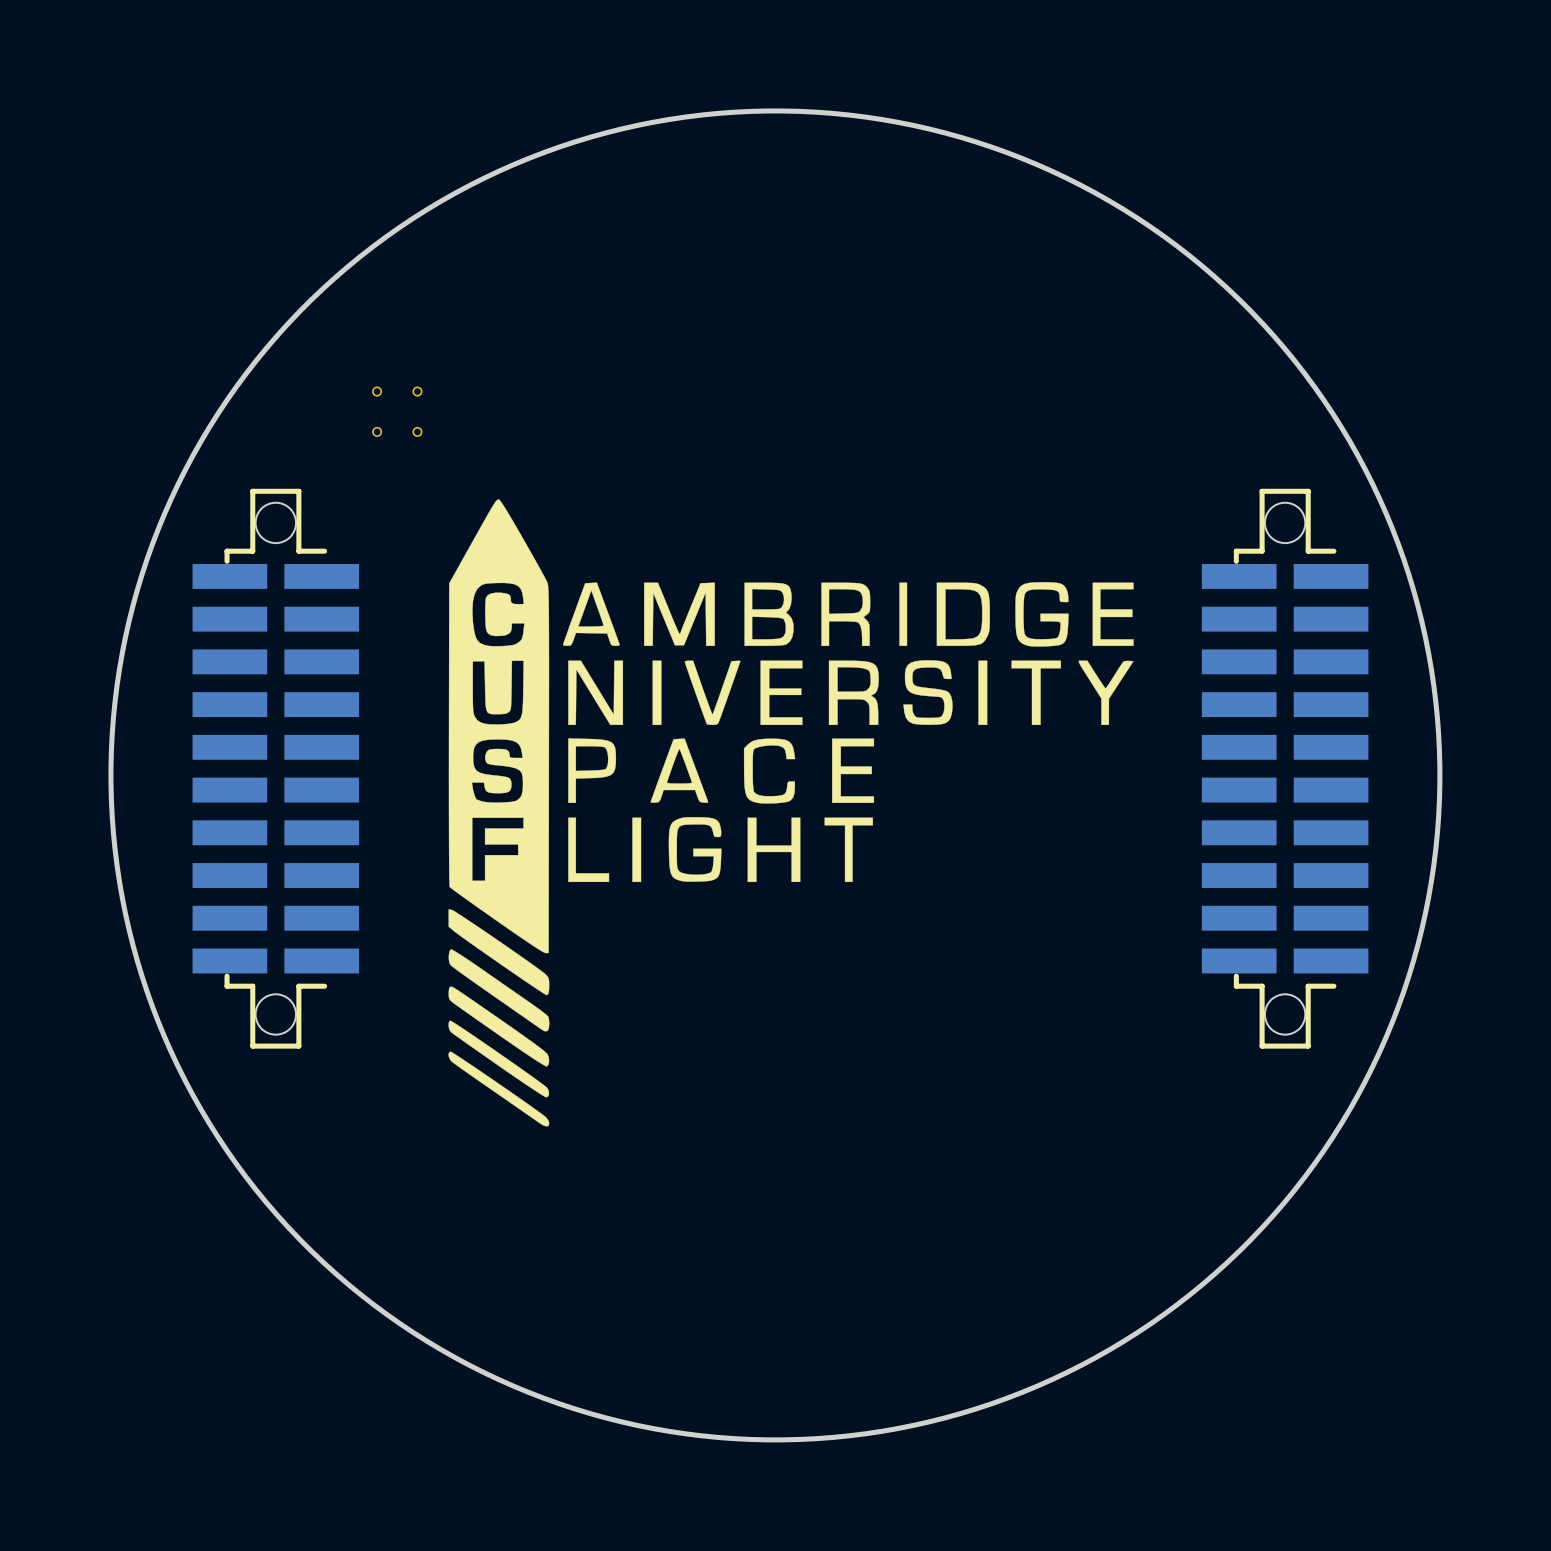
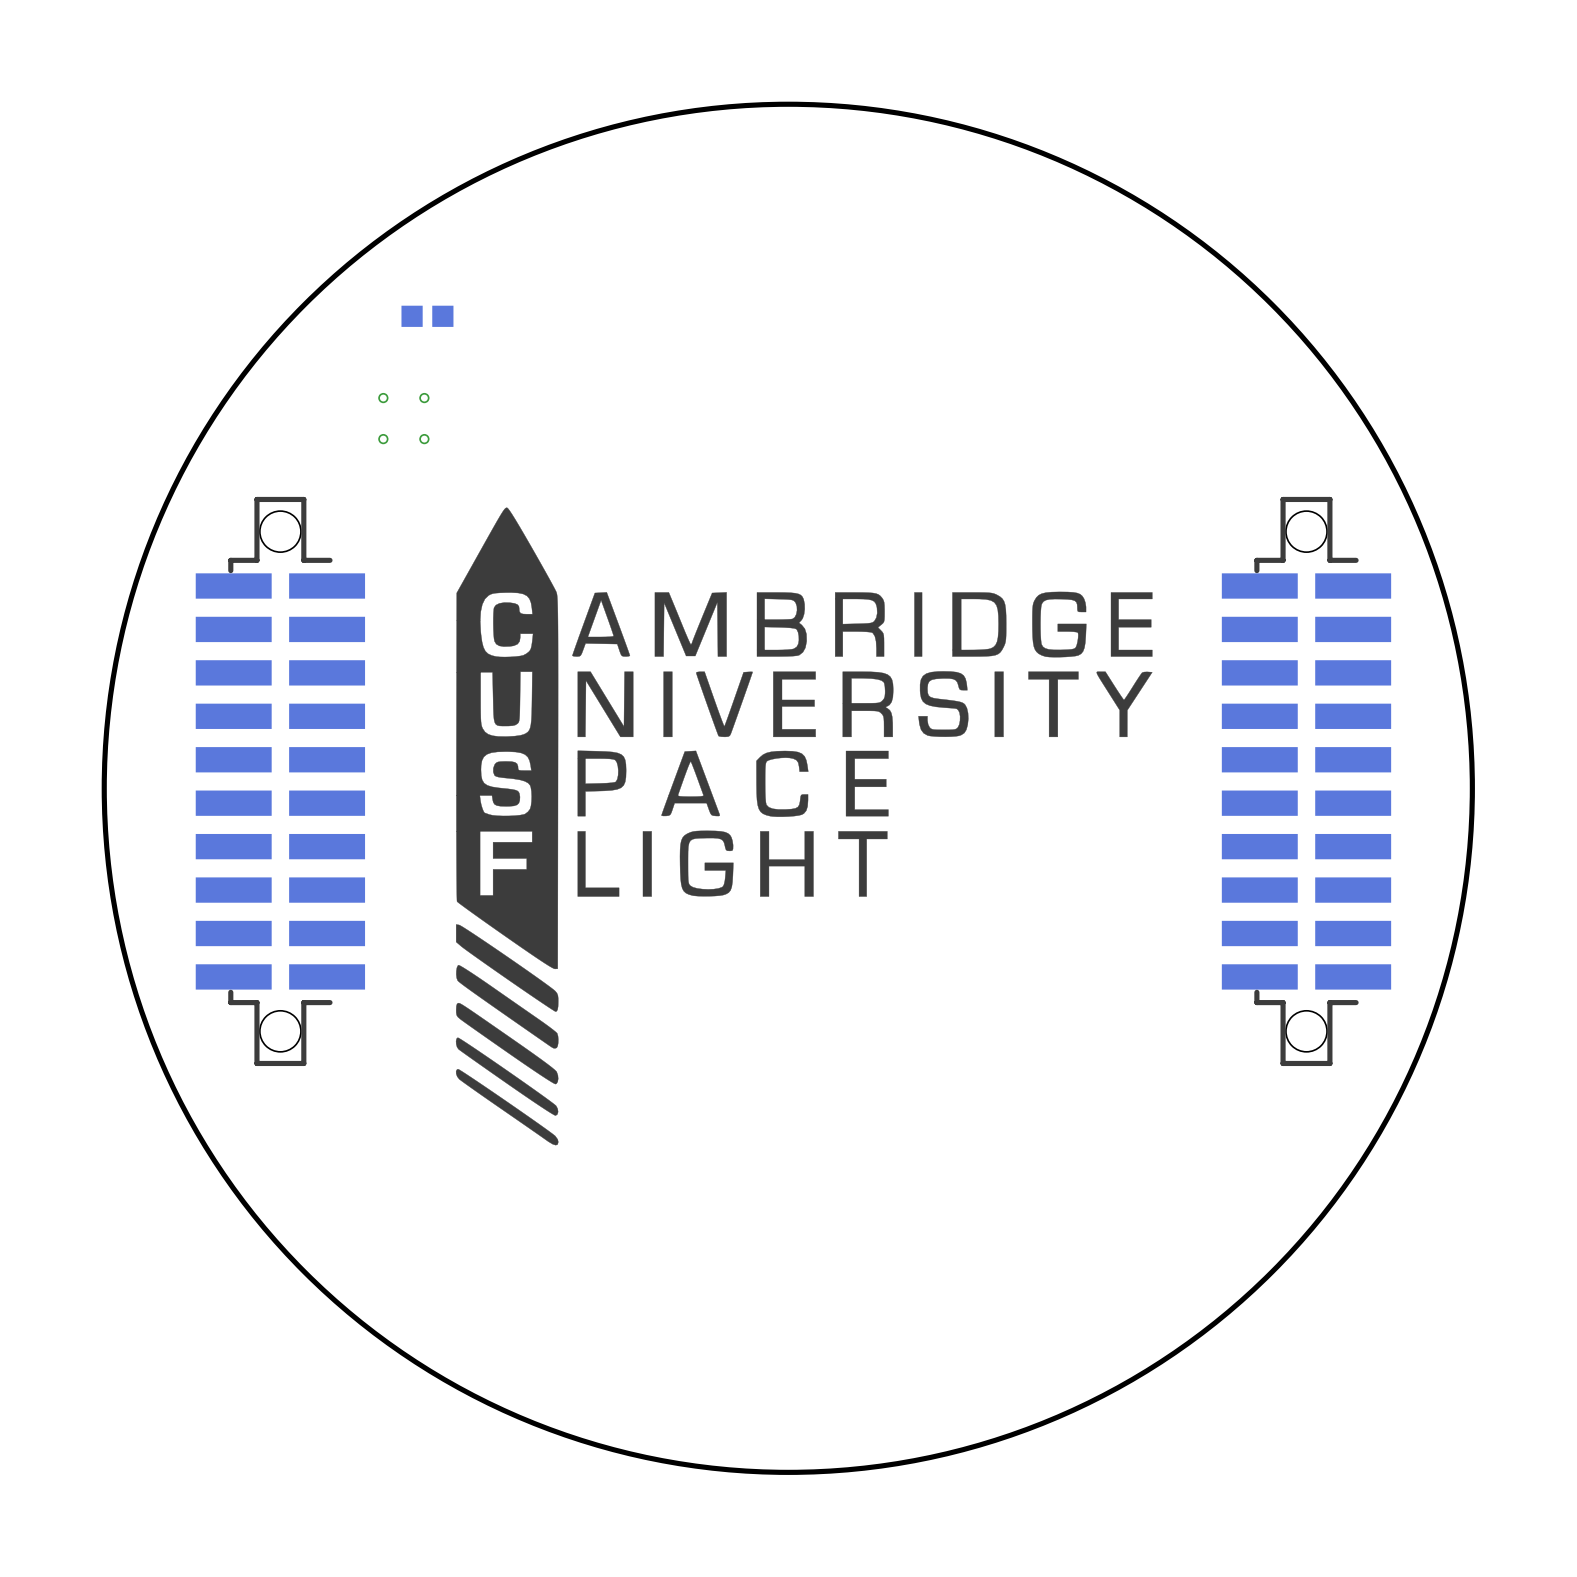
round board edge size: [108, 108, 1443, 1443] -> [101, 101, 1475, 1475]
part: none -> (427, 316)

